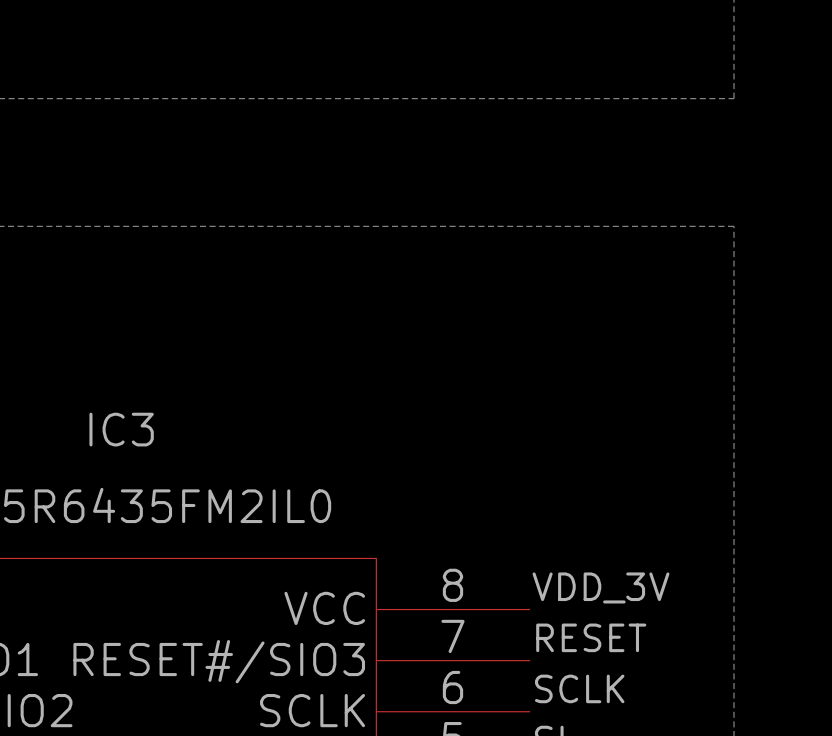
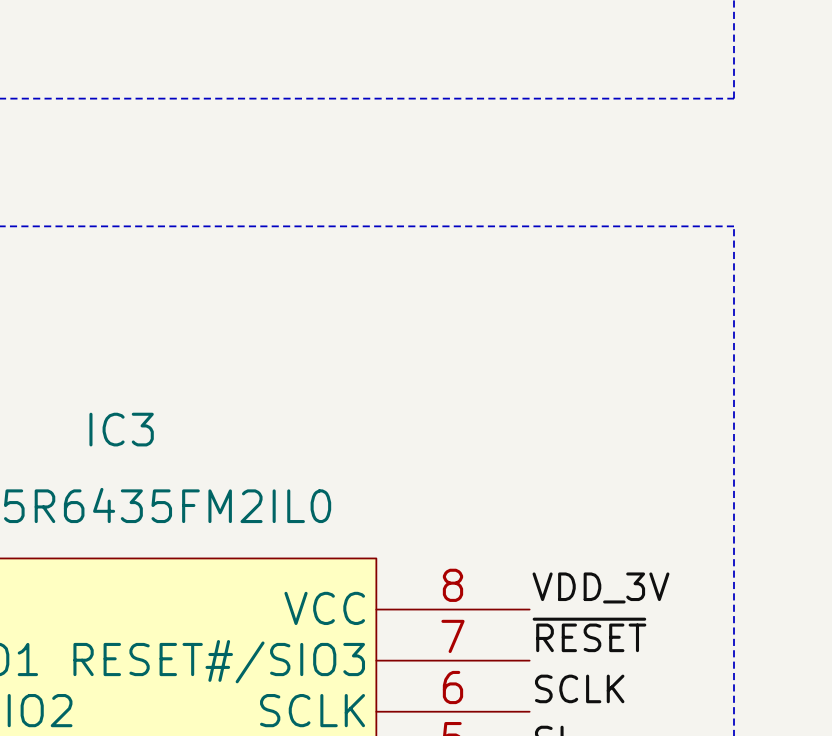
label: RESET (591, 637) -> ~{RESET} (589, 634)

